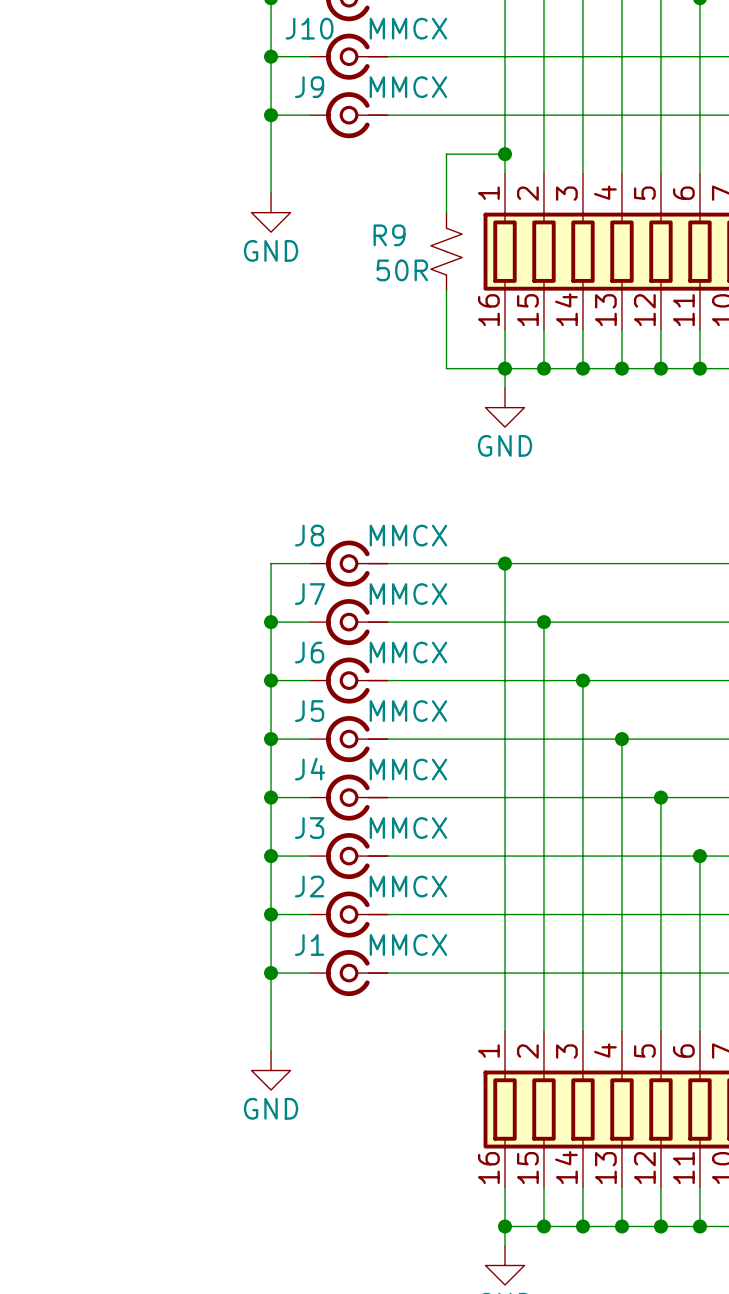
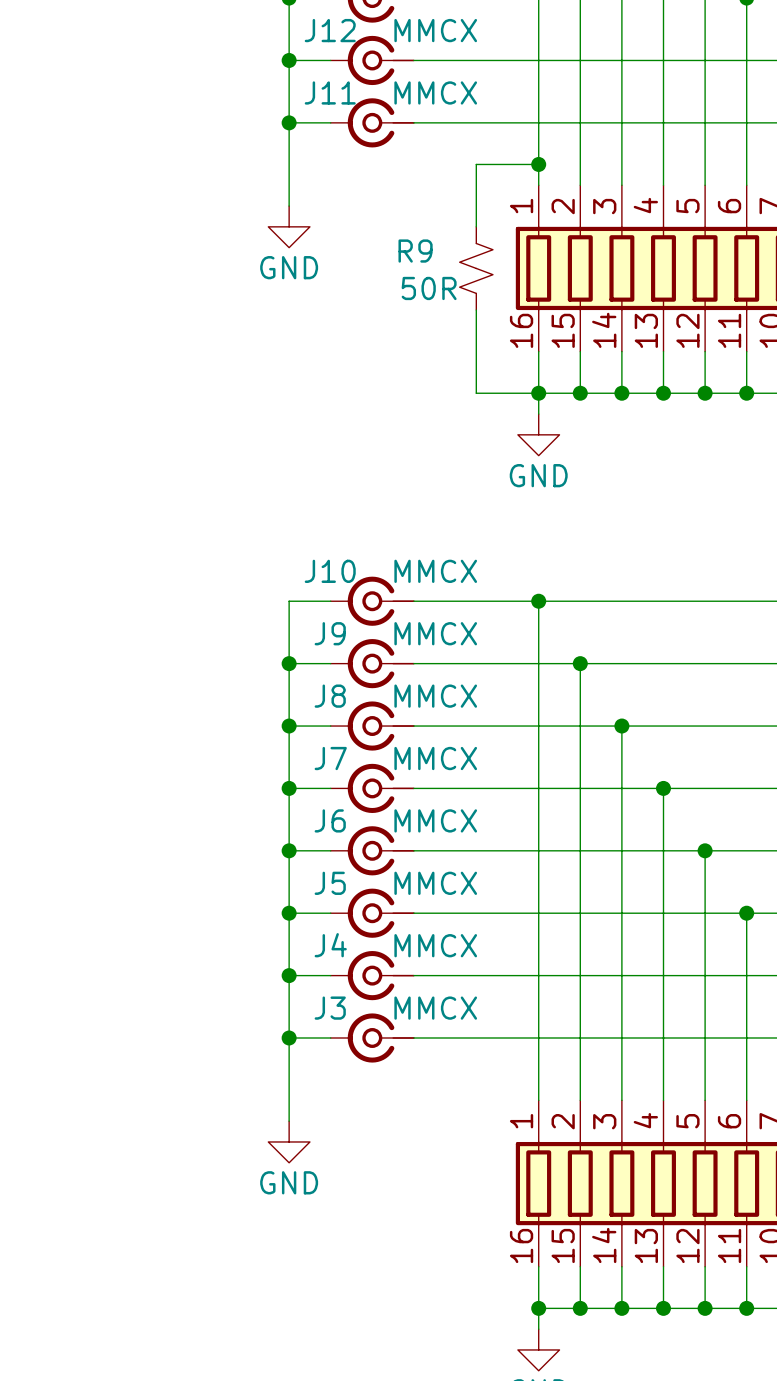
J10 name: J10 (309, 28) -> J12 (330, 30)
J9 name: J9 (309, 87) -> J11 (330, 92)
J8 name: J8 (309, 535) -> J10 (330, 571)
J7 name: J7 (310, 594) -> J9 (330, 633)
J6 name: J6 (309, 652) -> J8 (330, 696)
J5 name: J5 (309, 711) -> J7 (330, 758)
J4 name: J4 (310, 769) -> J6 (330, 820)
J3 name: J3 (309, 828) -> J5 (330, 883)
J2 name: J2 (309, 886) -> J4 (330, 945)
J1 name: J1 (309, 945) -> J3 (330, 1008)

